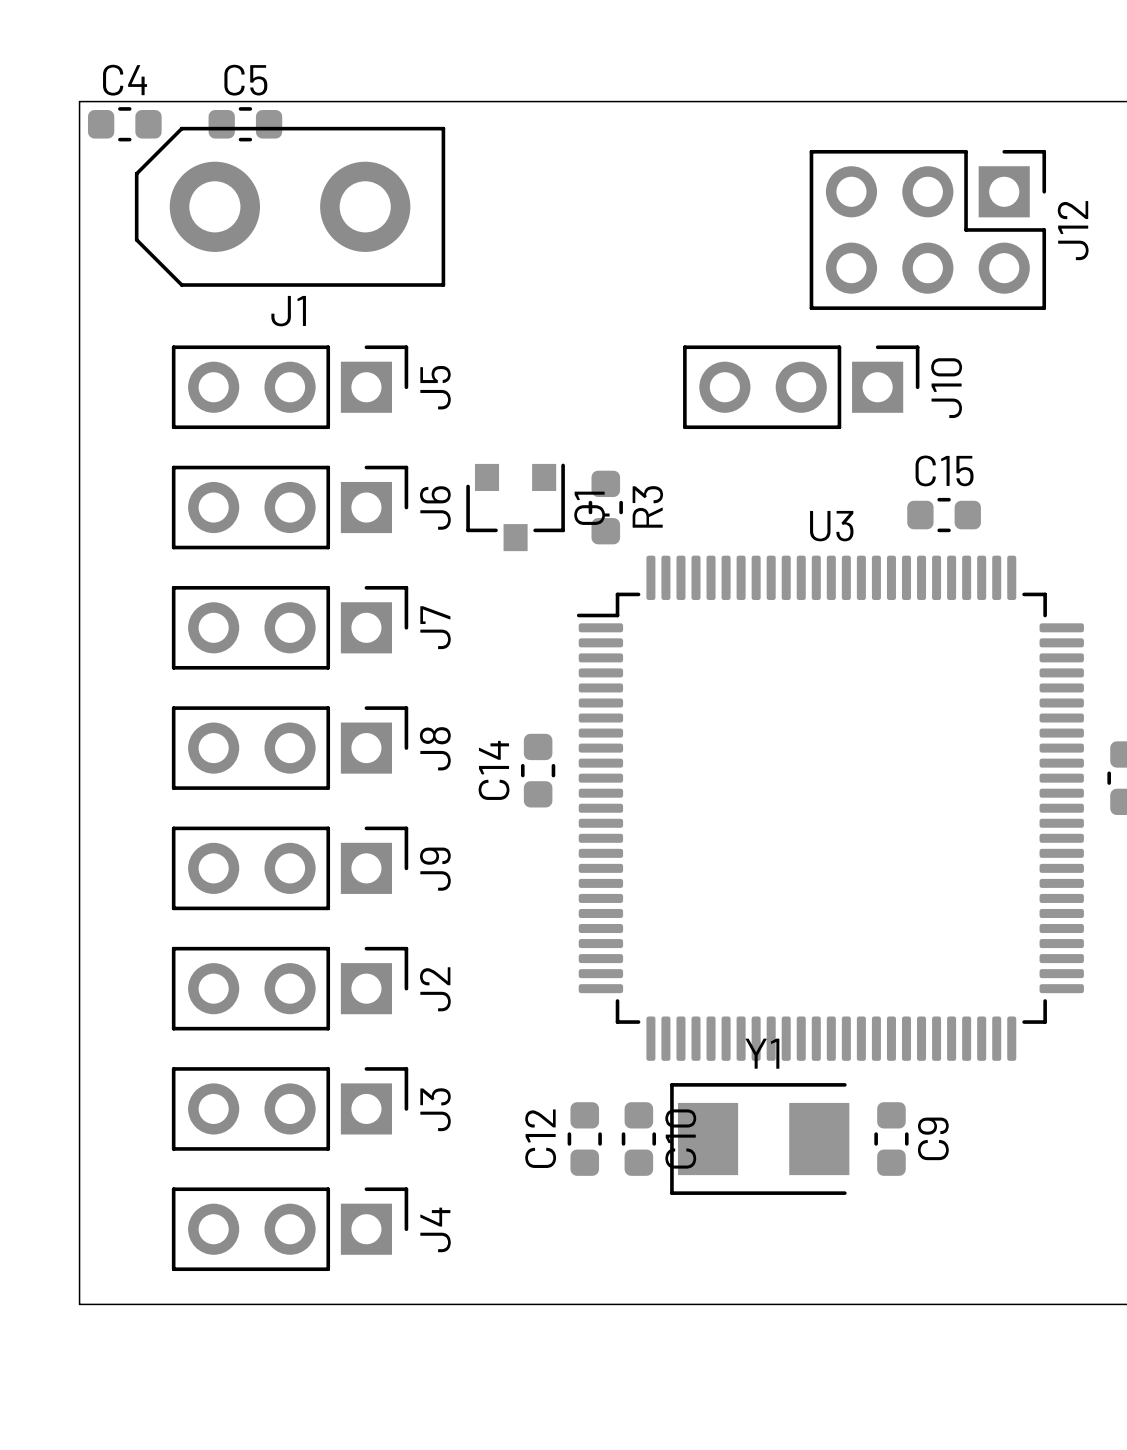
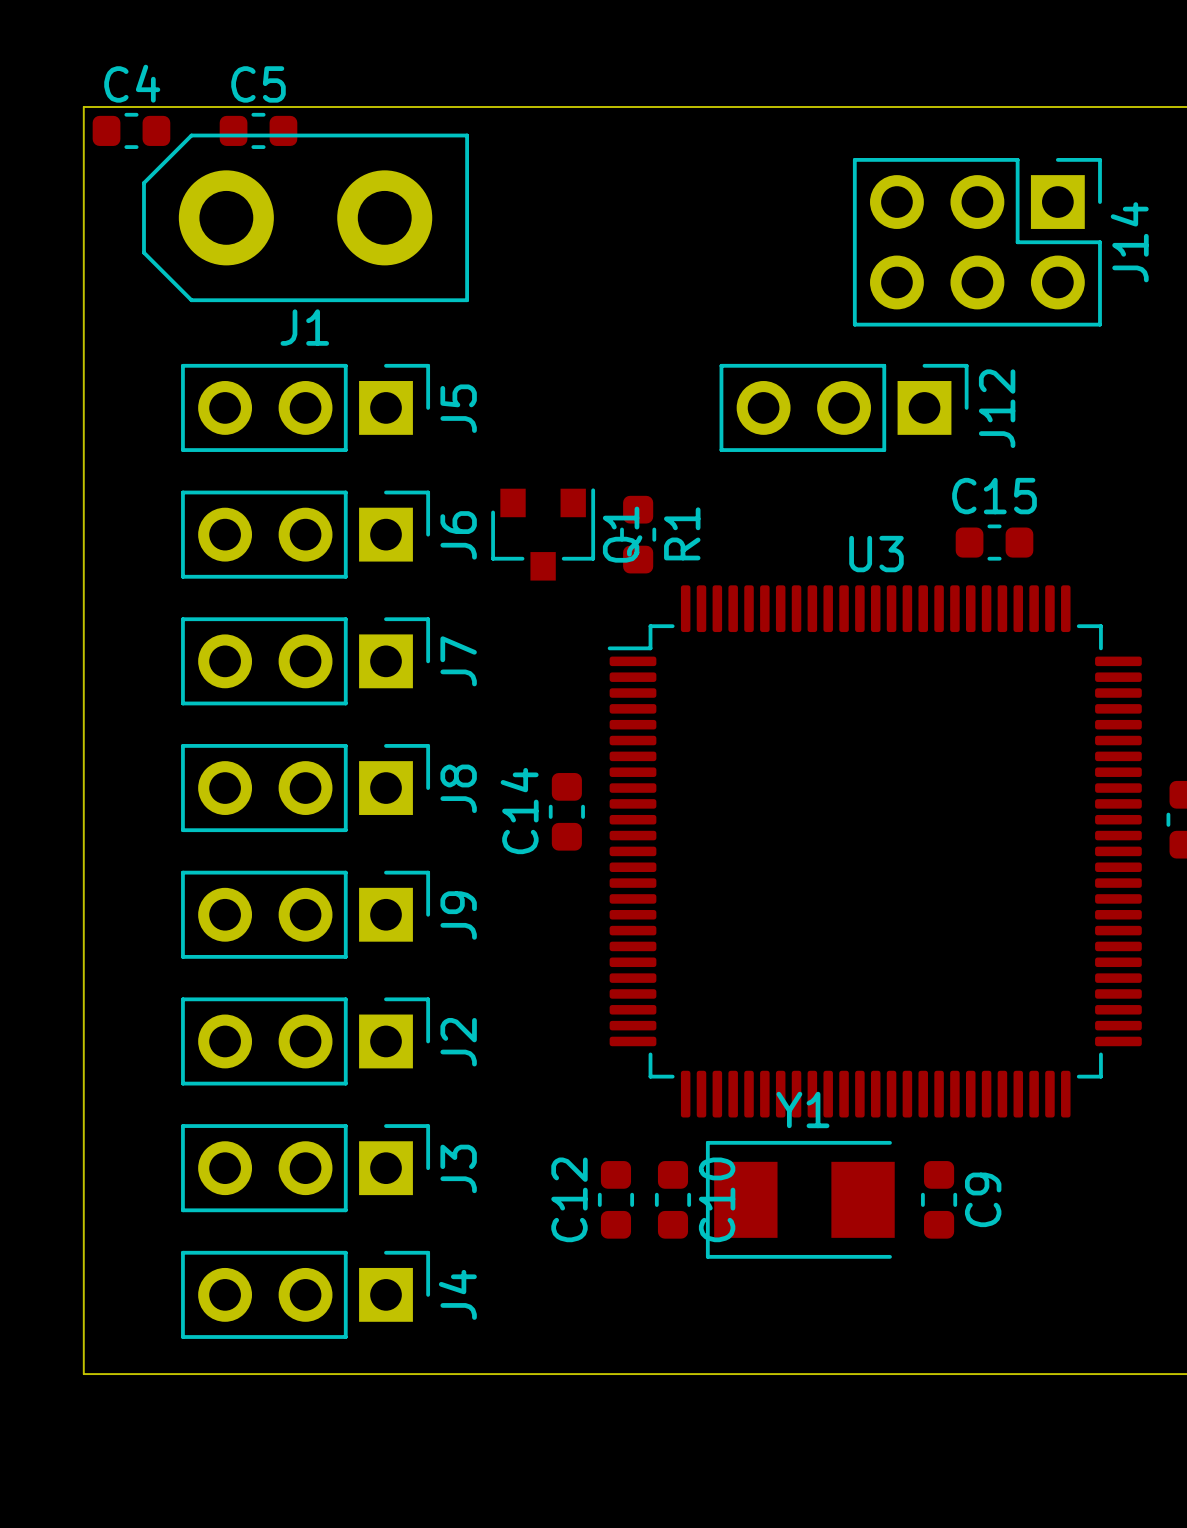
J12 name: J12 (1073, 230) -> J14 (1129, 242)
J10 name: J10 (946, 388) -> J12 (997, 408)
R3 name: R3 (647, 506) -> R1 (682, 533)

